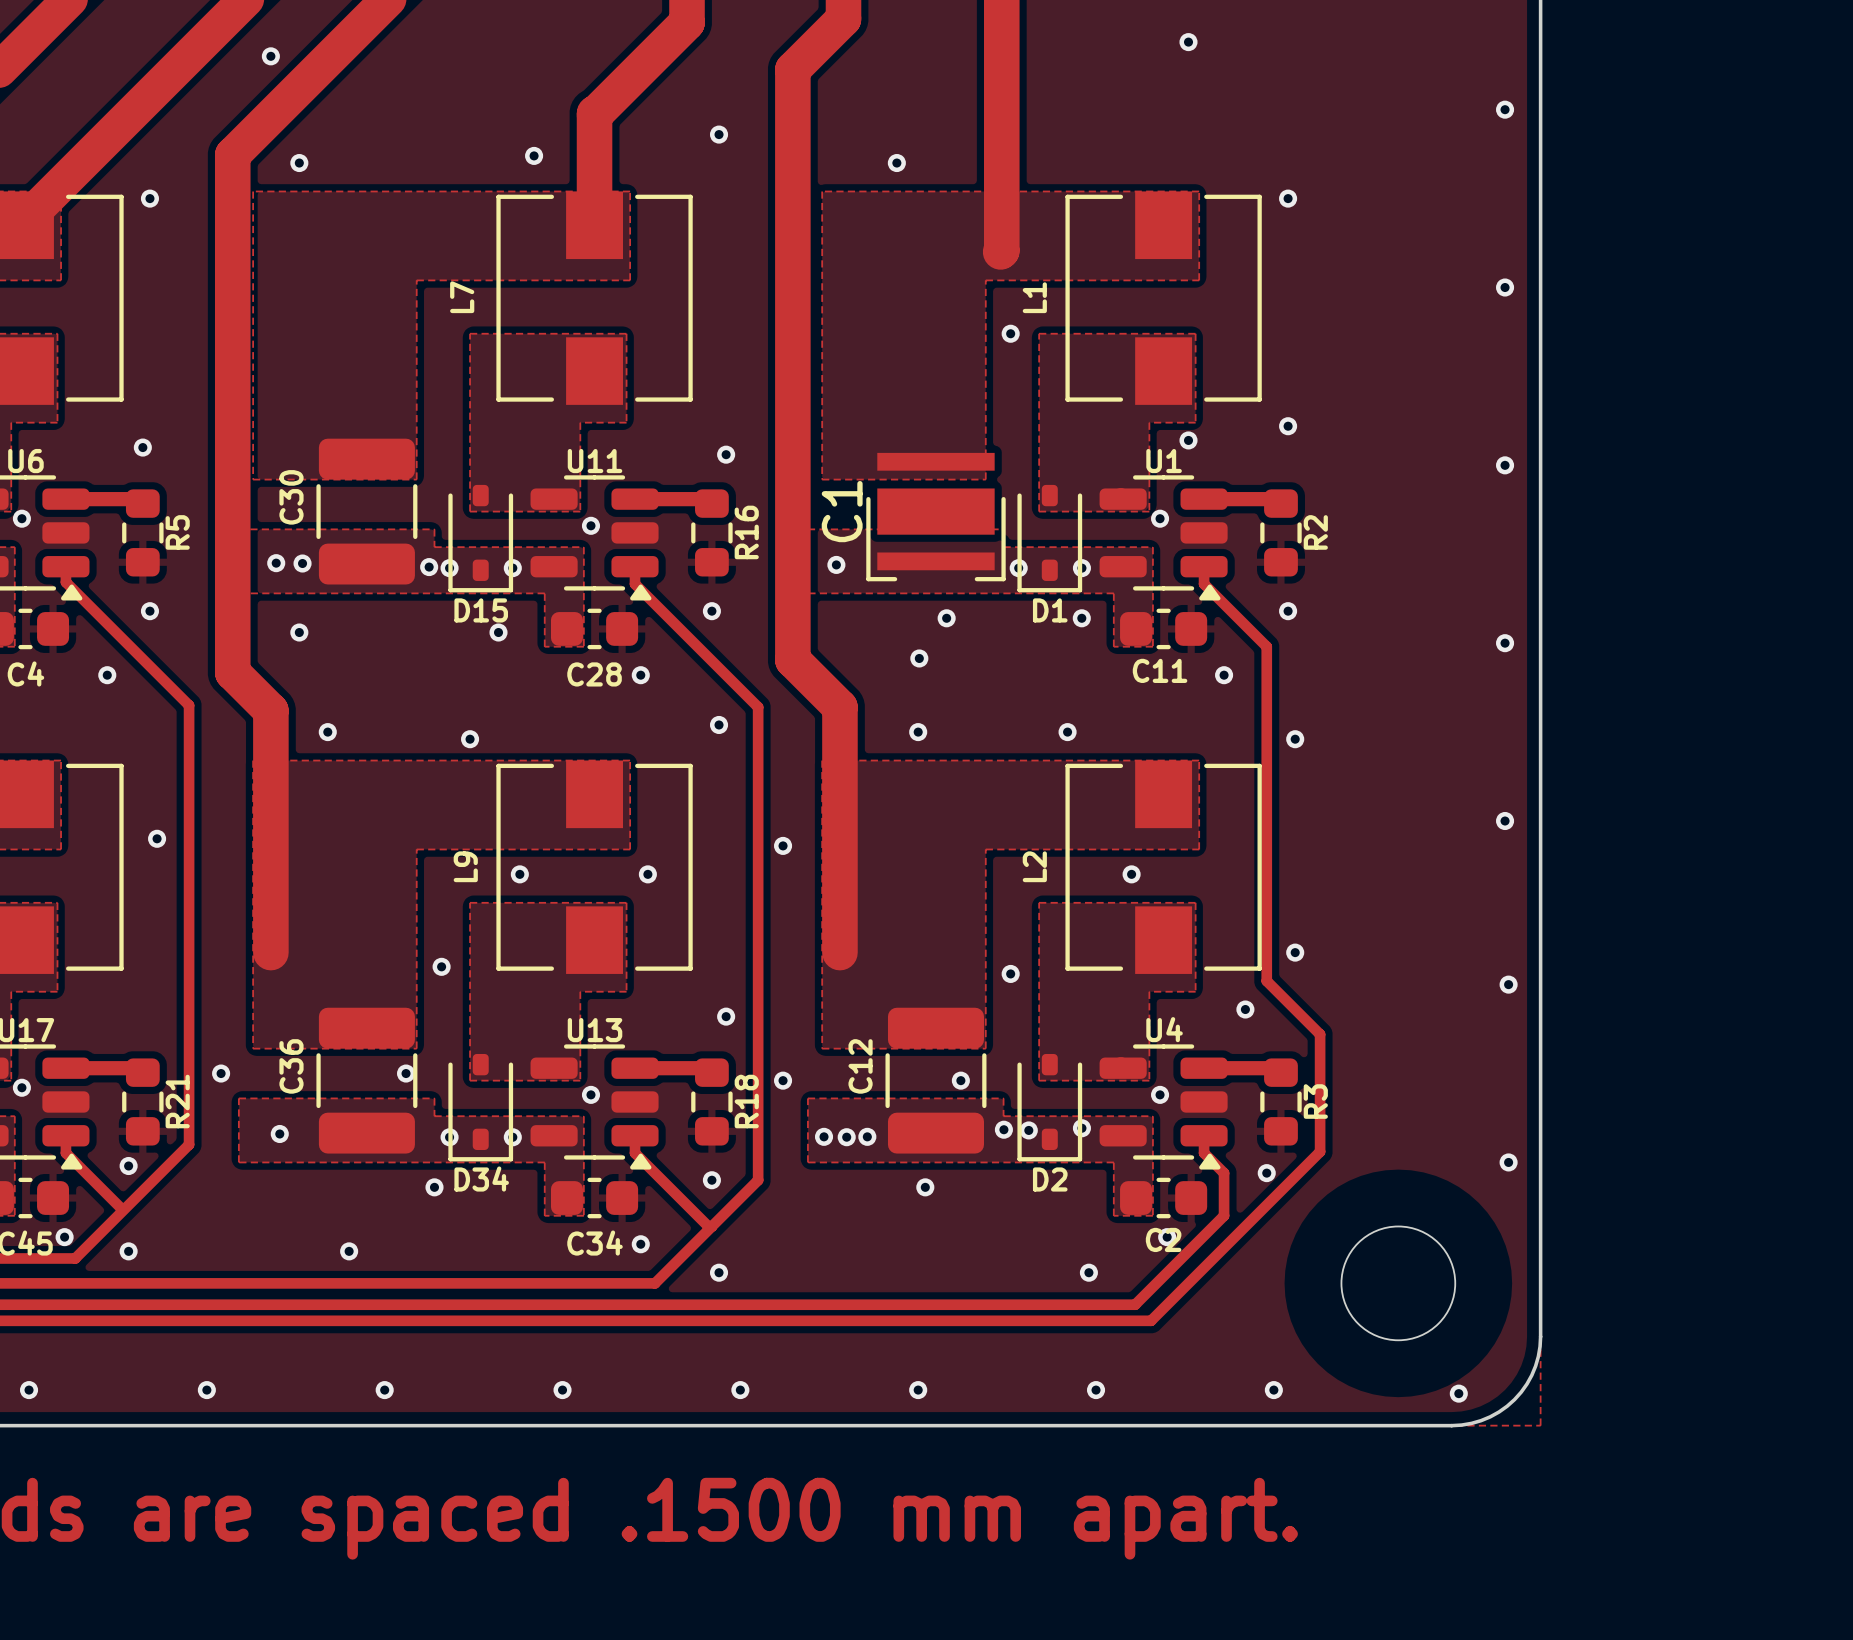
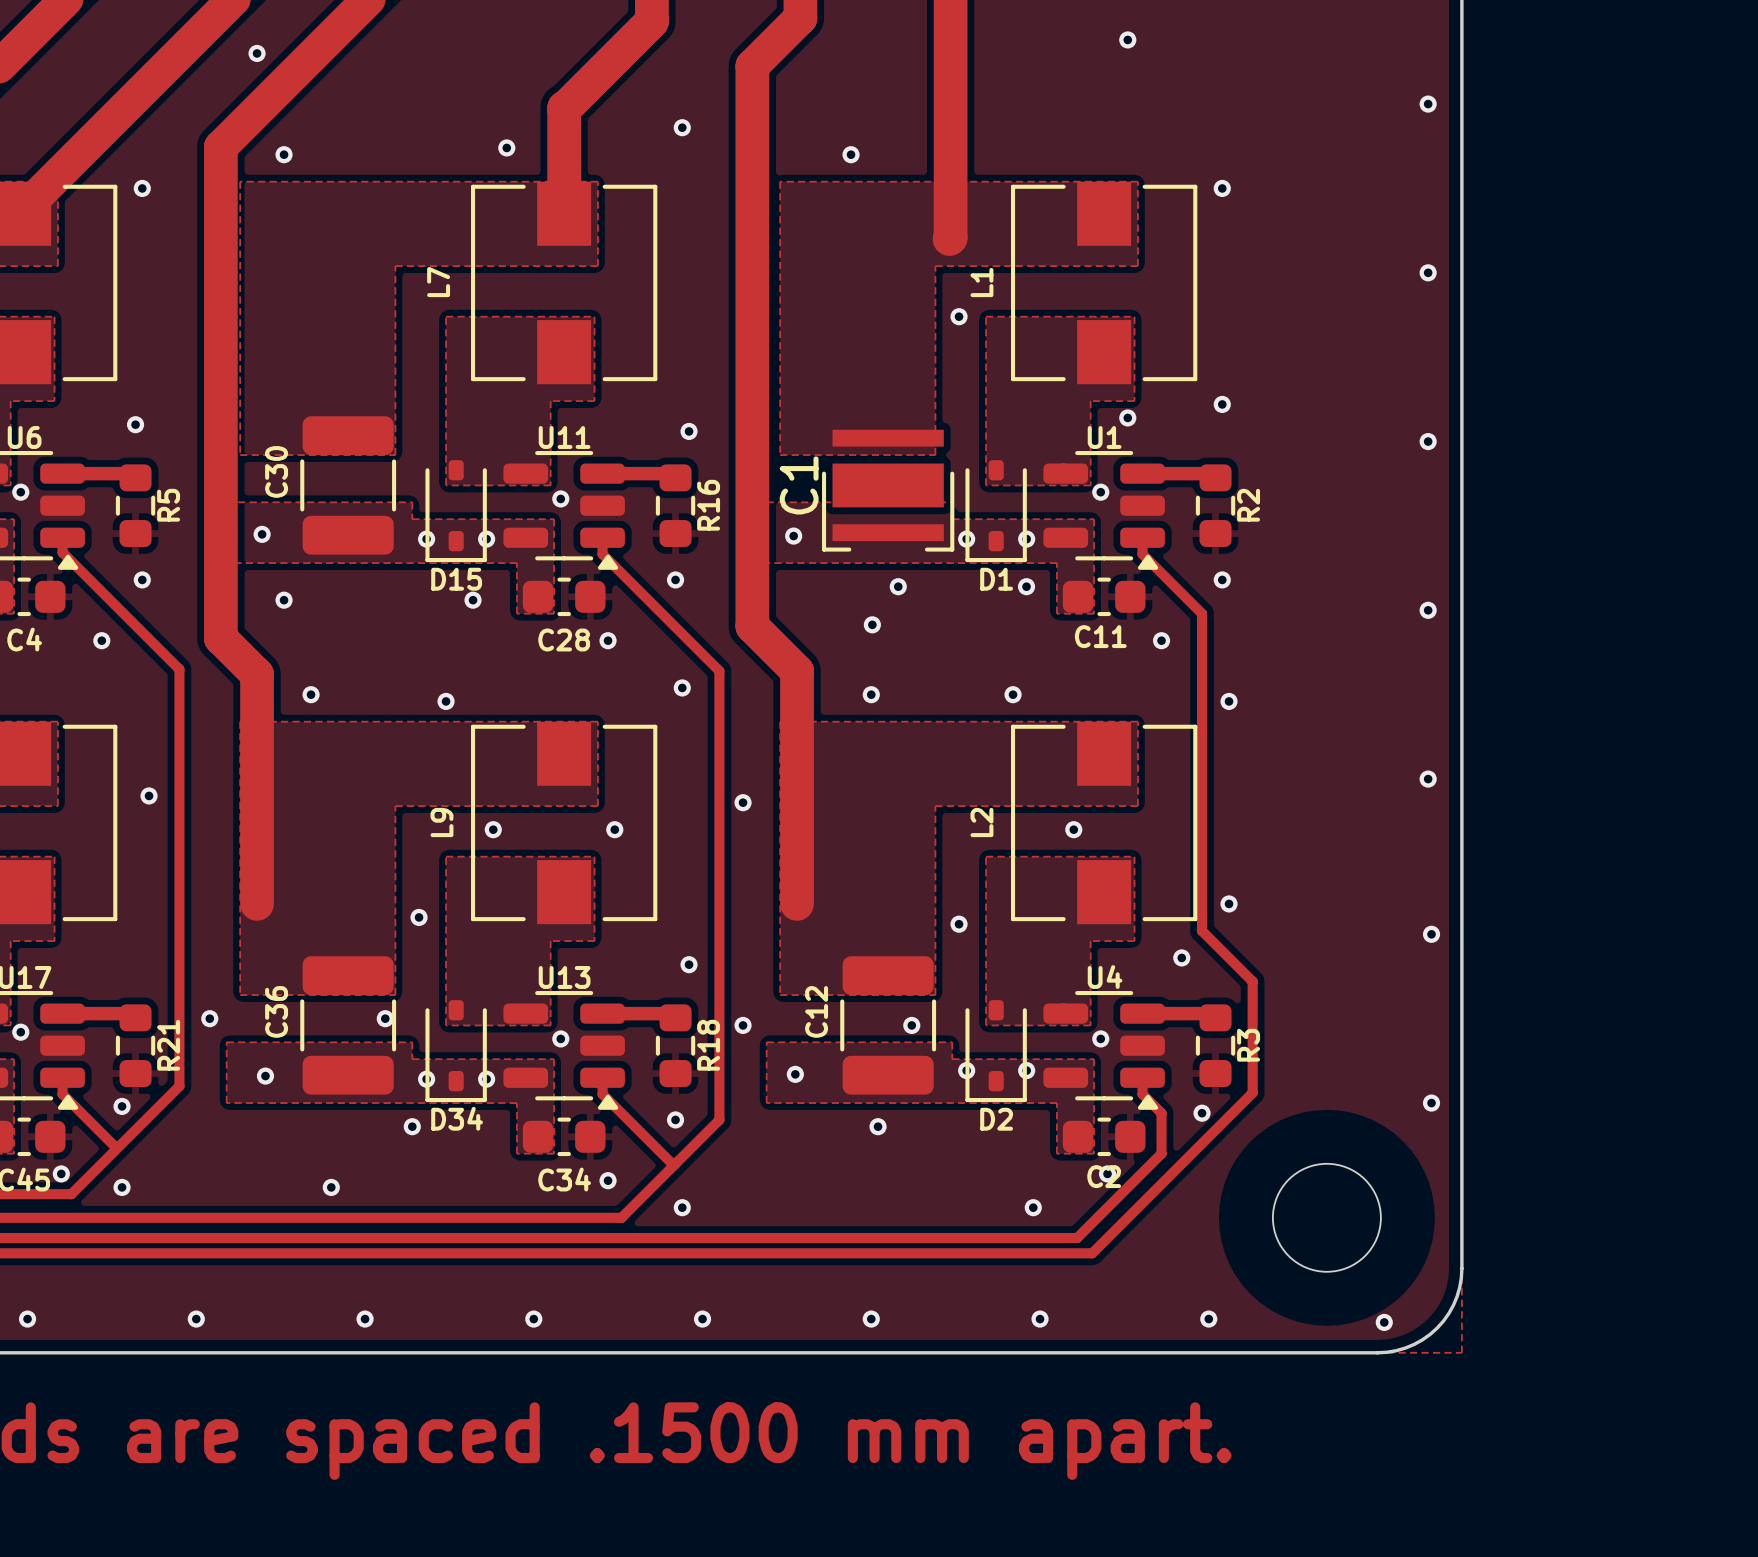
via: (302, 563) -> none
via: (429, 567) -> none
via: none -> (966, 1070)
via: (1003, 1129) -> none
via: (1028, 1130) -> none
via: none -> (795, 1074)
via: (824, 1136) -> none
via: (867, 1136) -> none
via: (846, 1137) -> none

